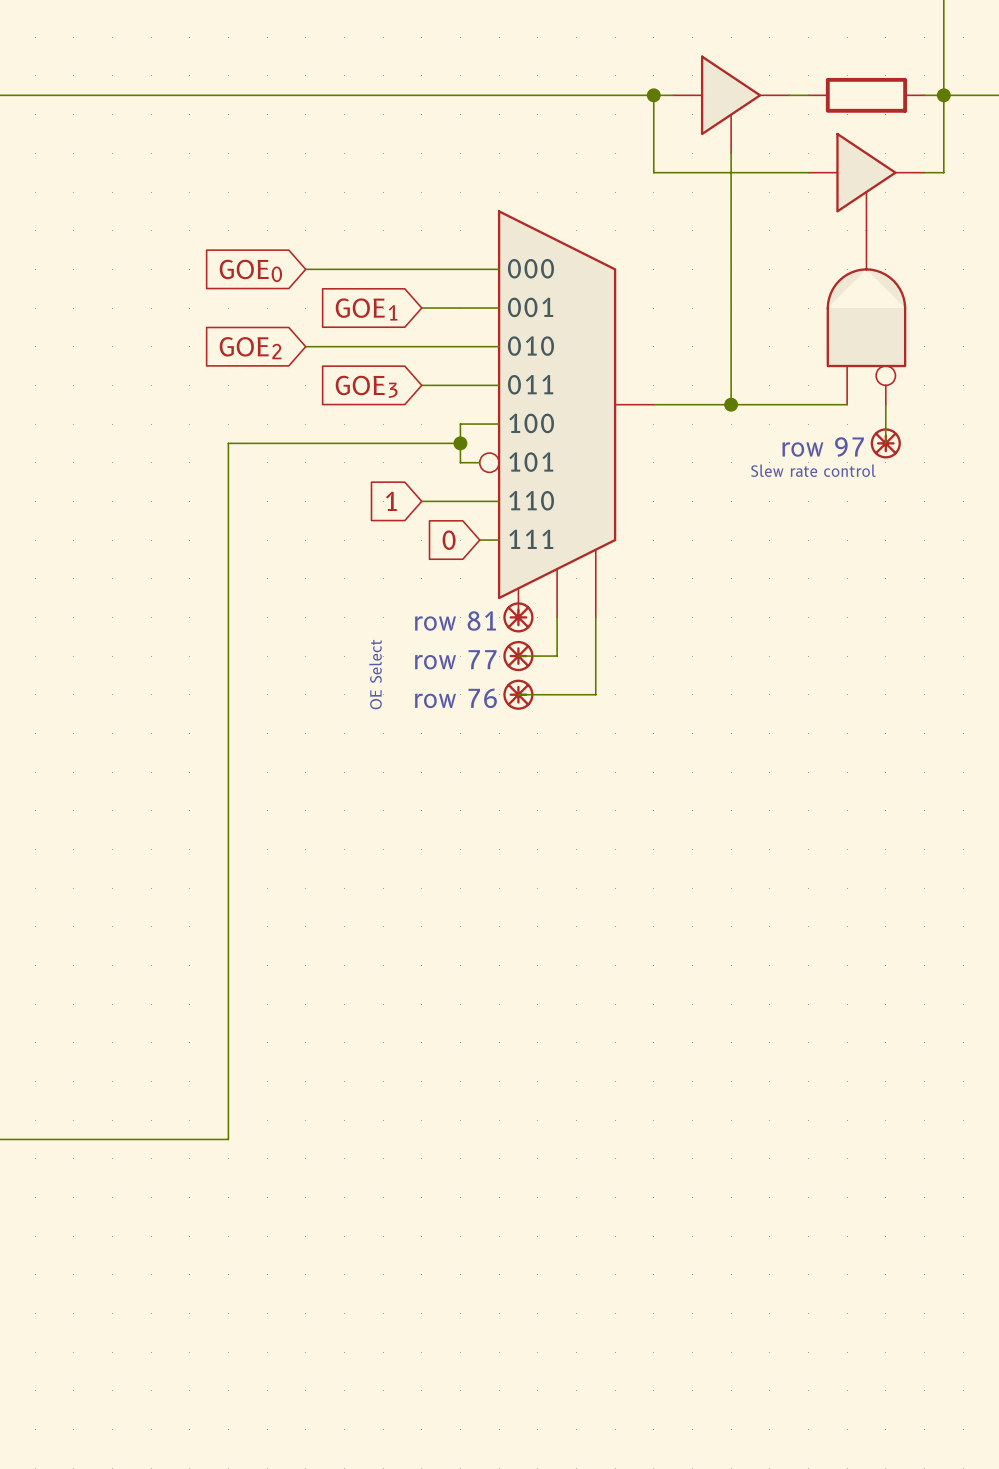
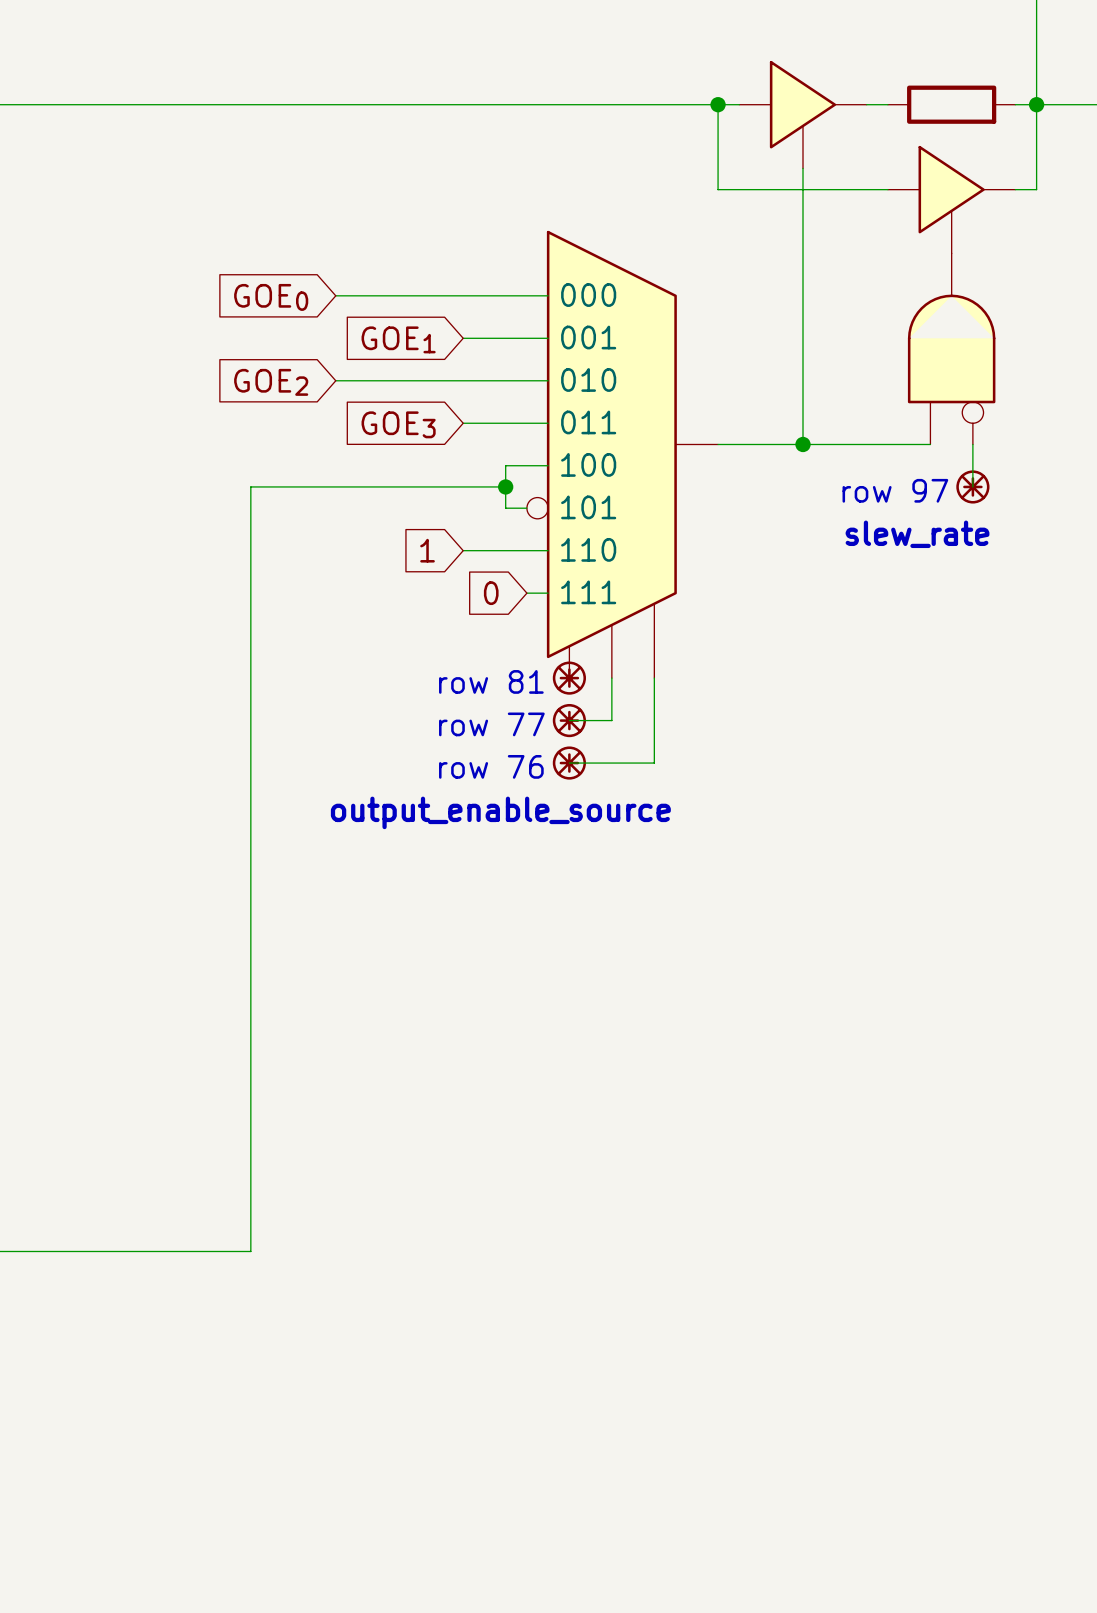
text: Slew rate control (813, 470) -> none
text: none -> slew_rate (917, 534)
text: OE Select (375, 674) -> none
text: none -> output_enable_source (500, 812)

